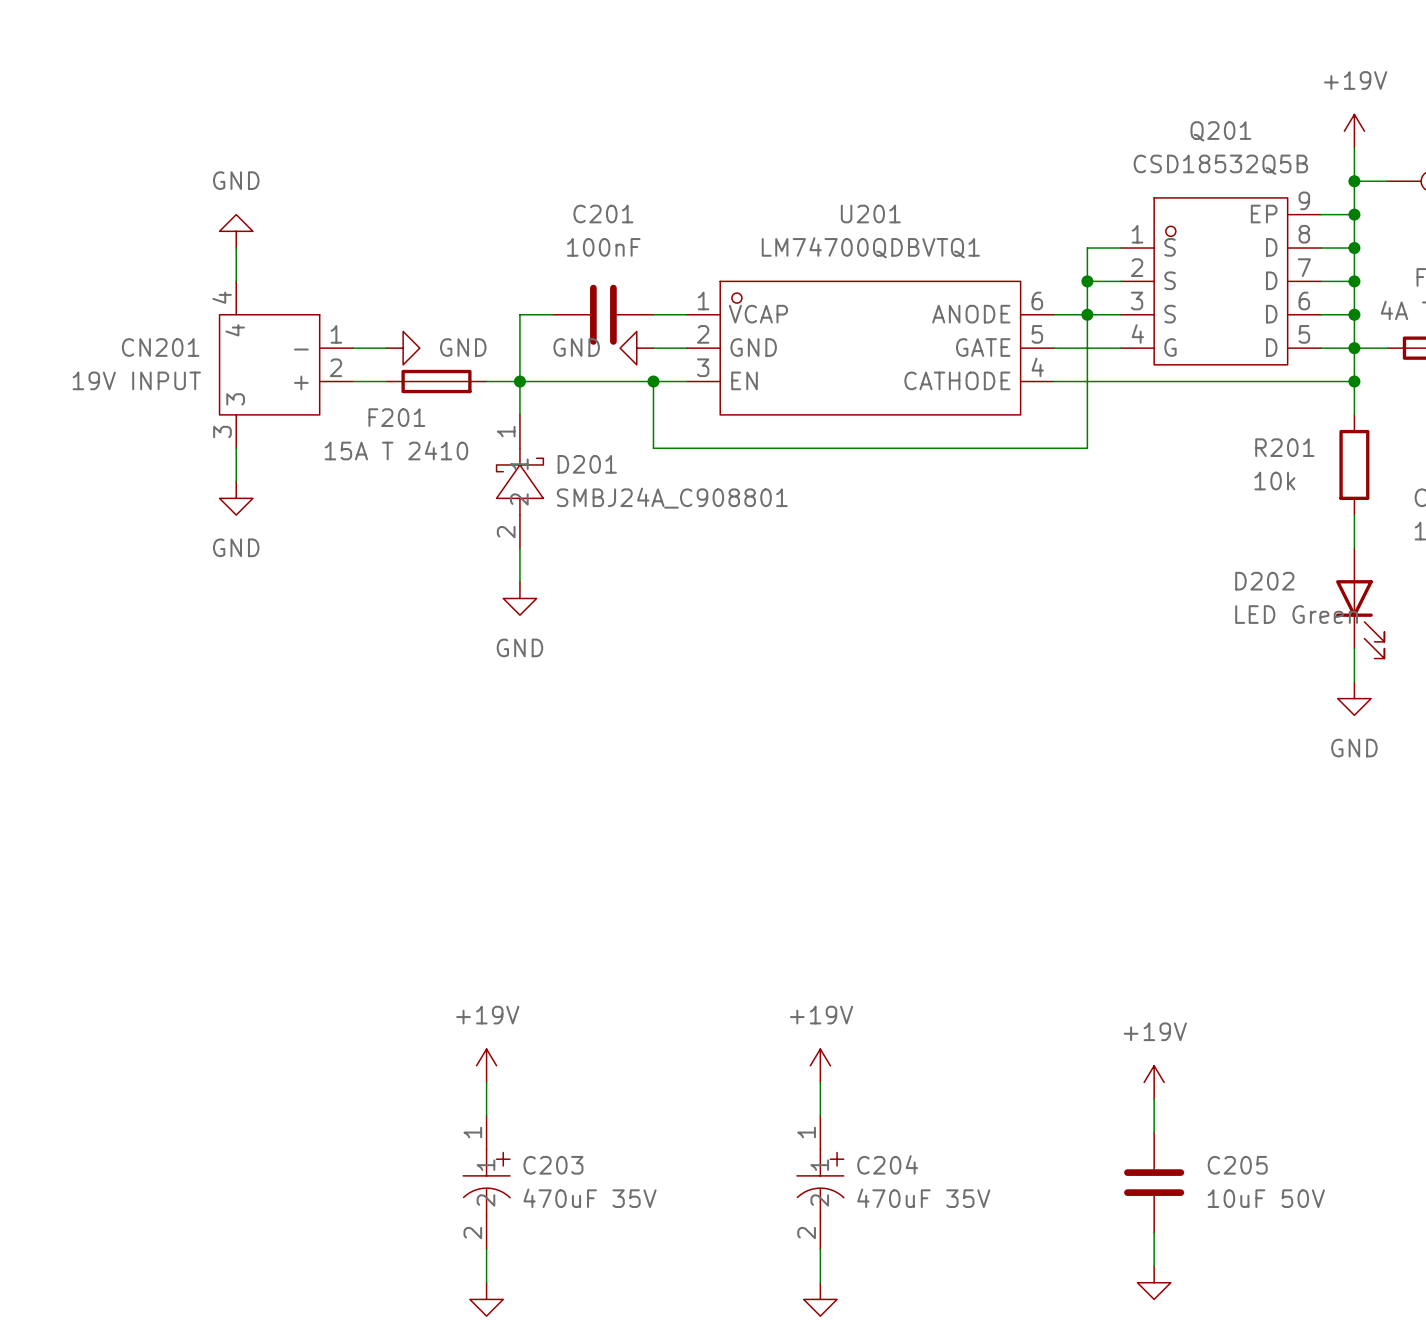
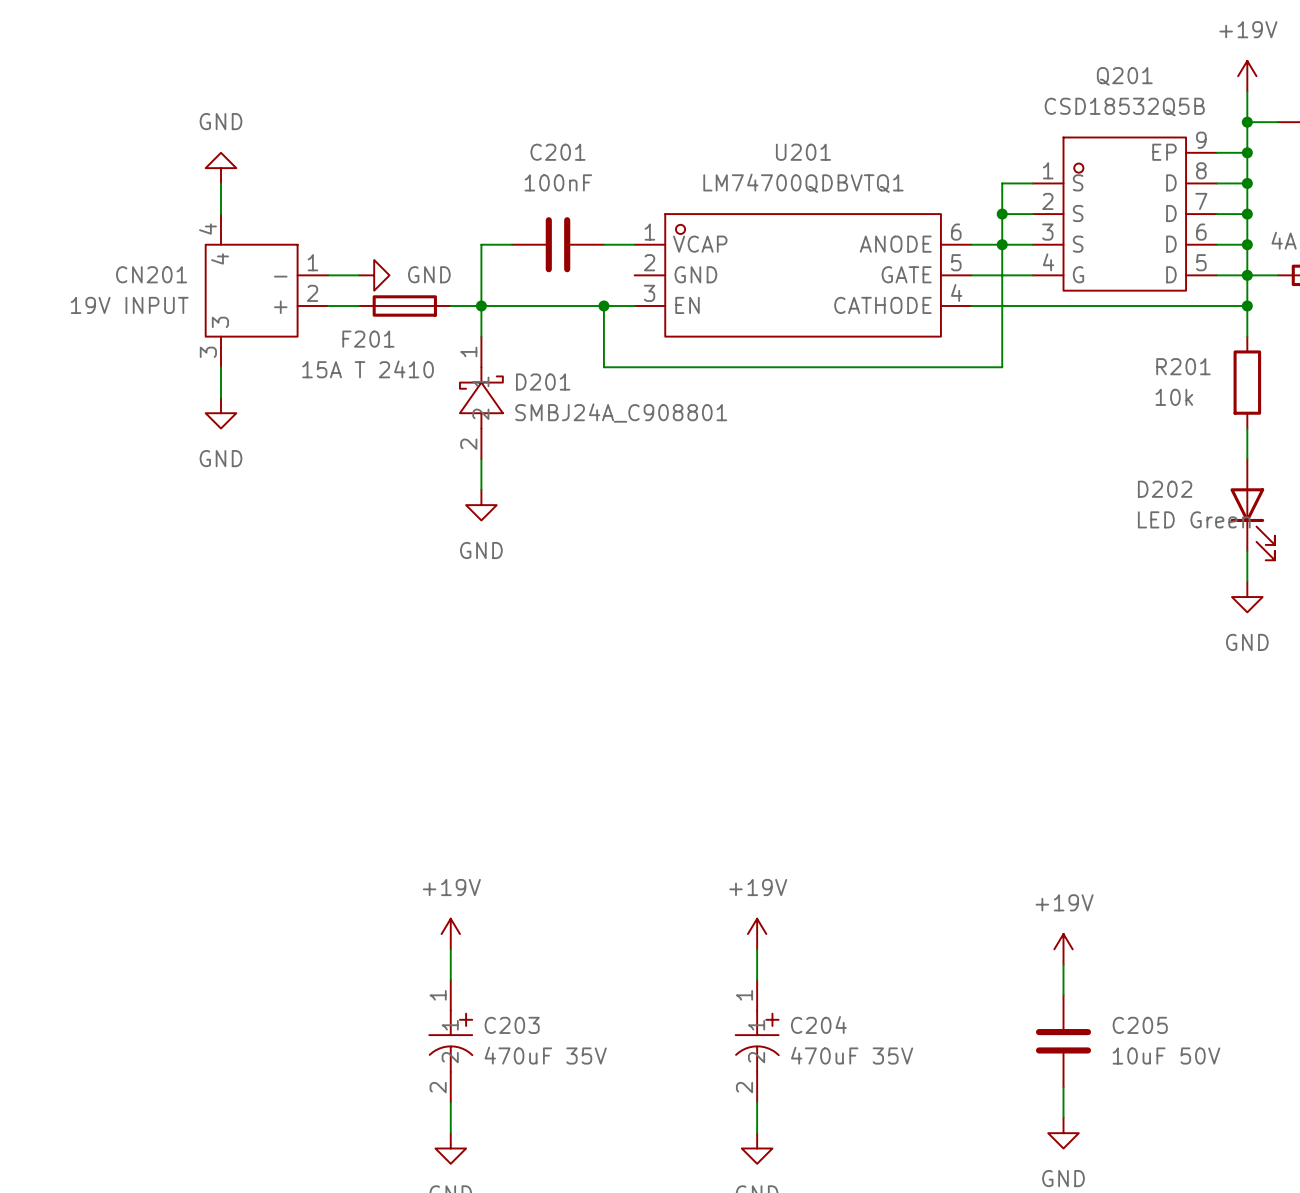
power symbol: GND (636, 348) -> none
wire: (653, 348) (686, 348) -> none

